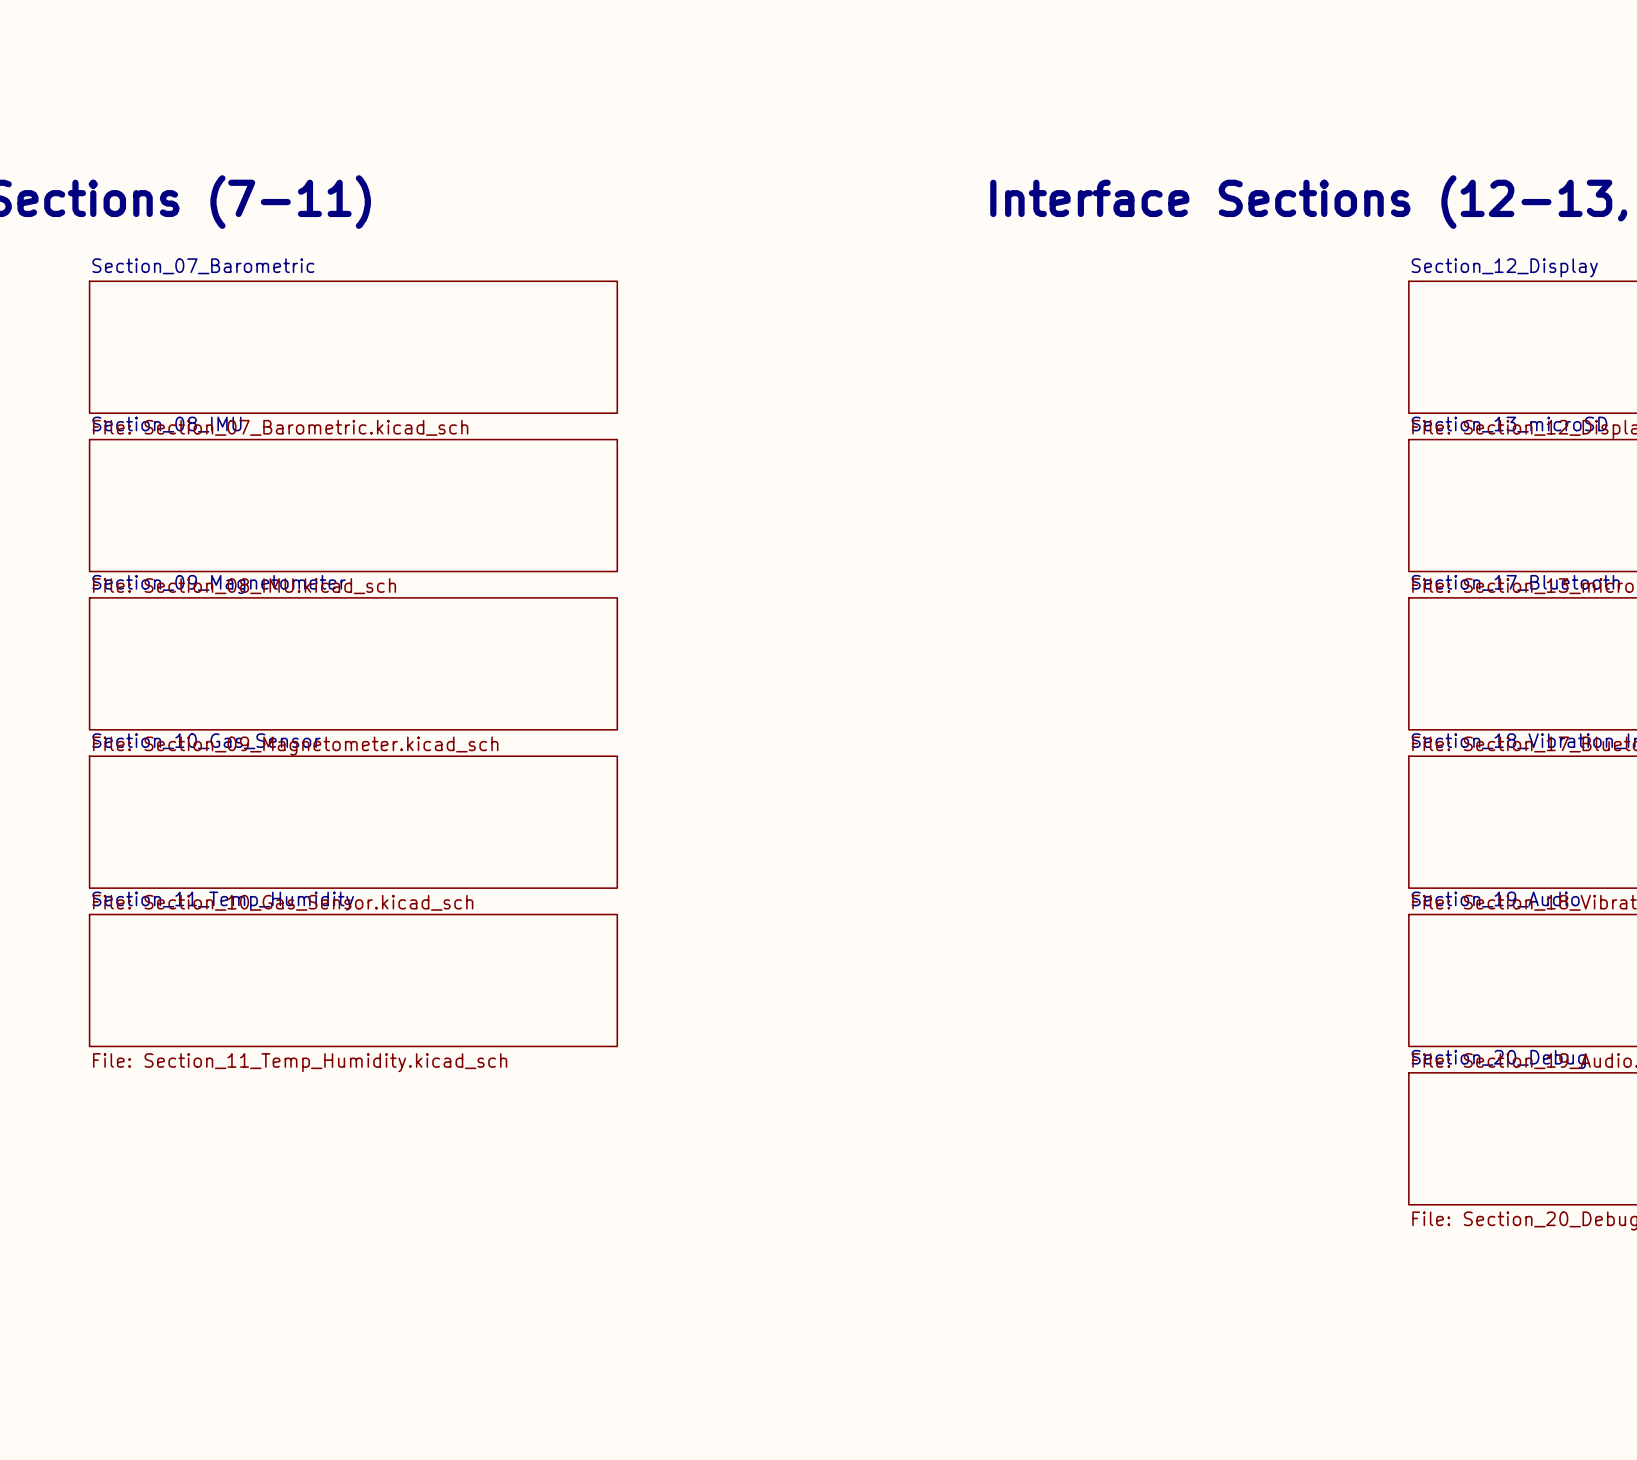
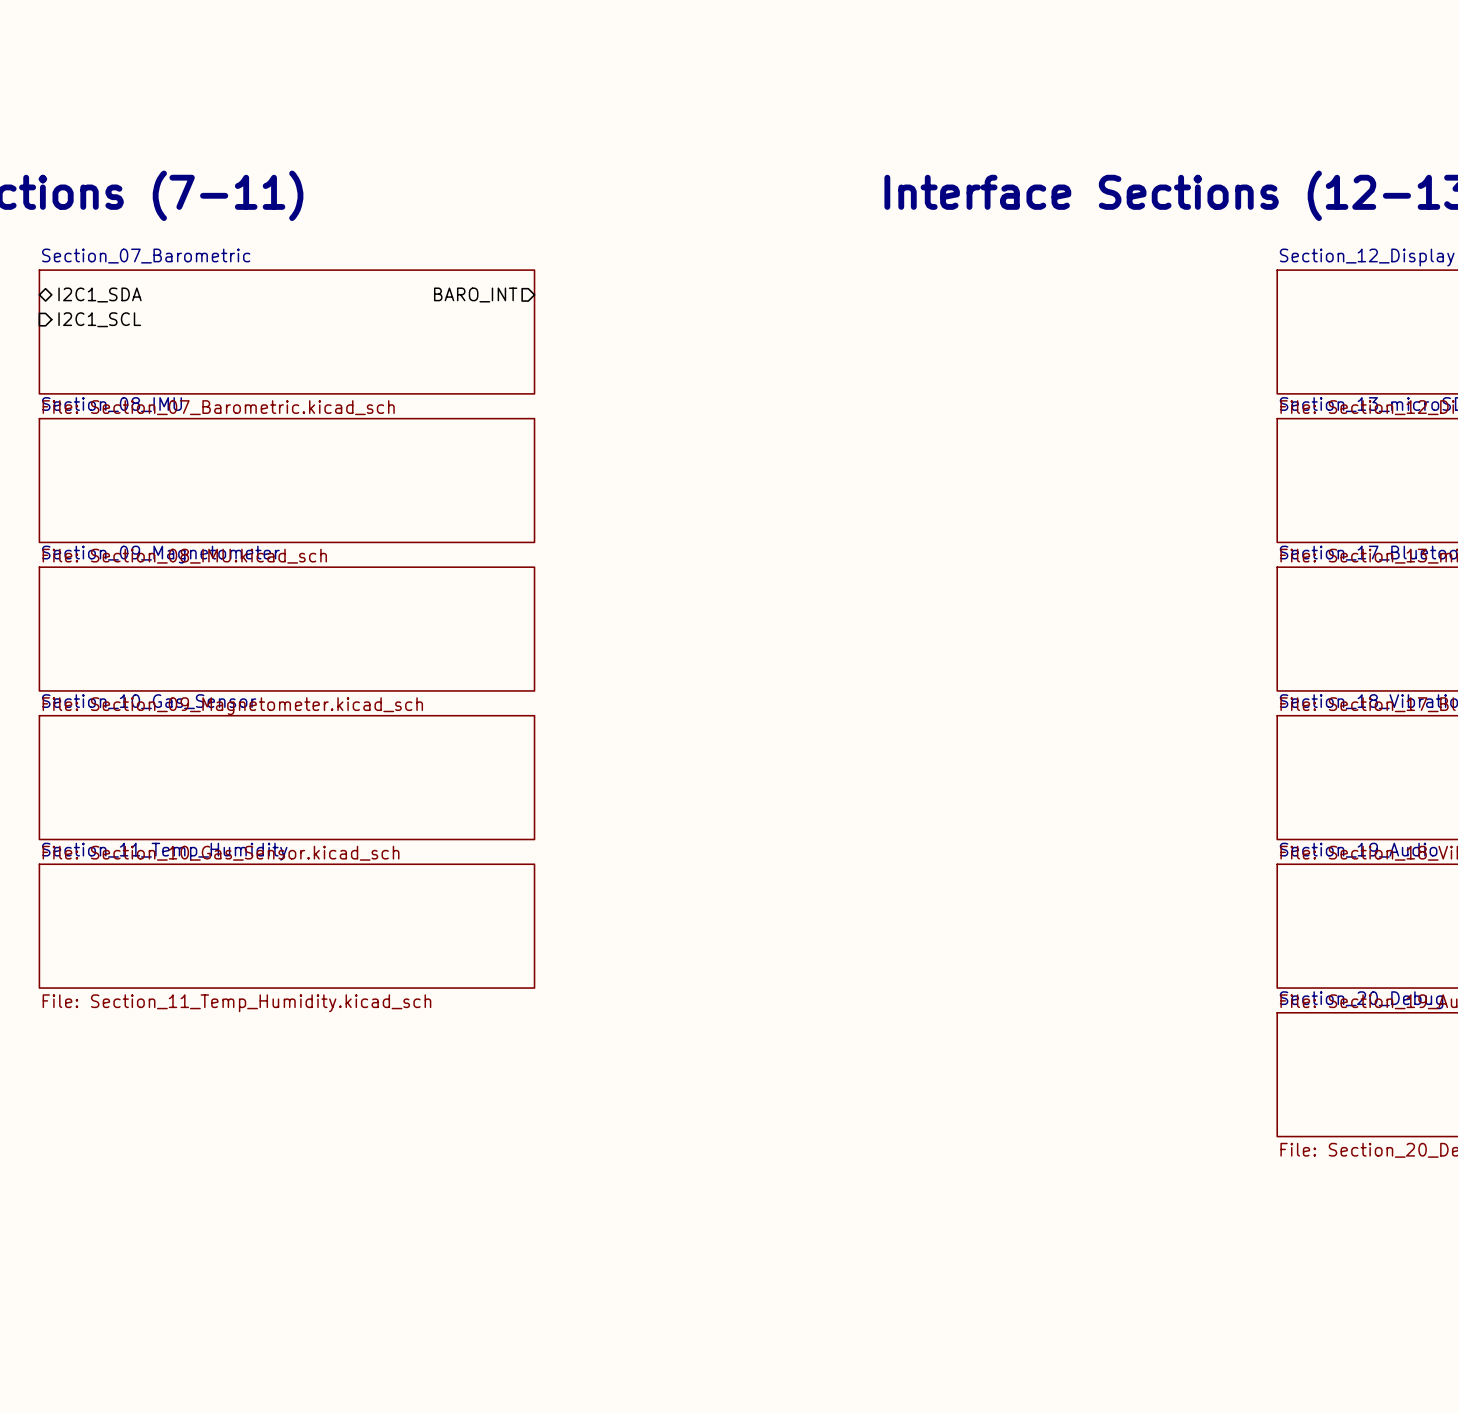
sheet pin: none -> I2C1_SDA (100, 294)
sheet pin: none -> BARO_INT (475, 294)
sheet pin: none -> I2C1_SCL (99, 319)

